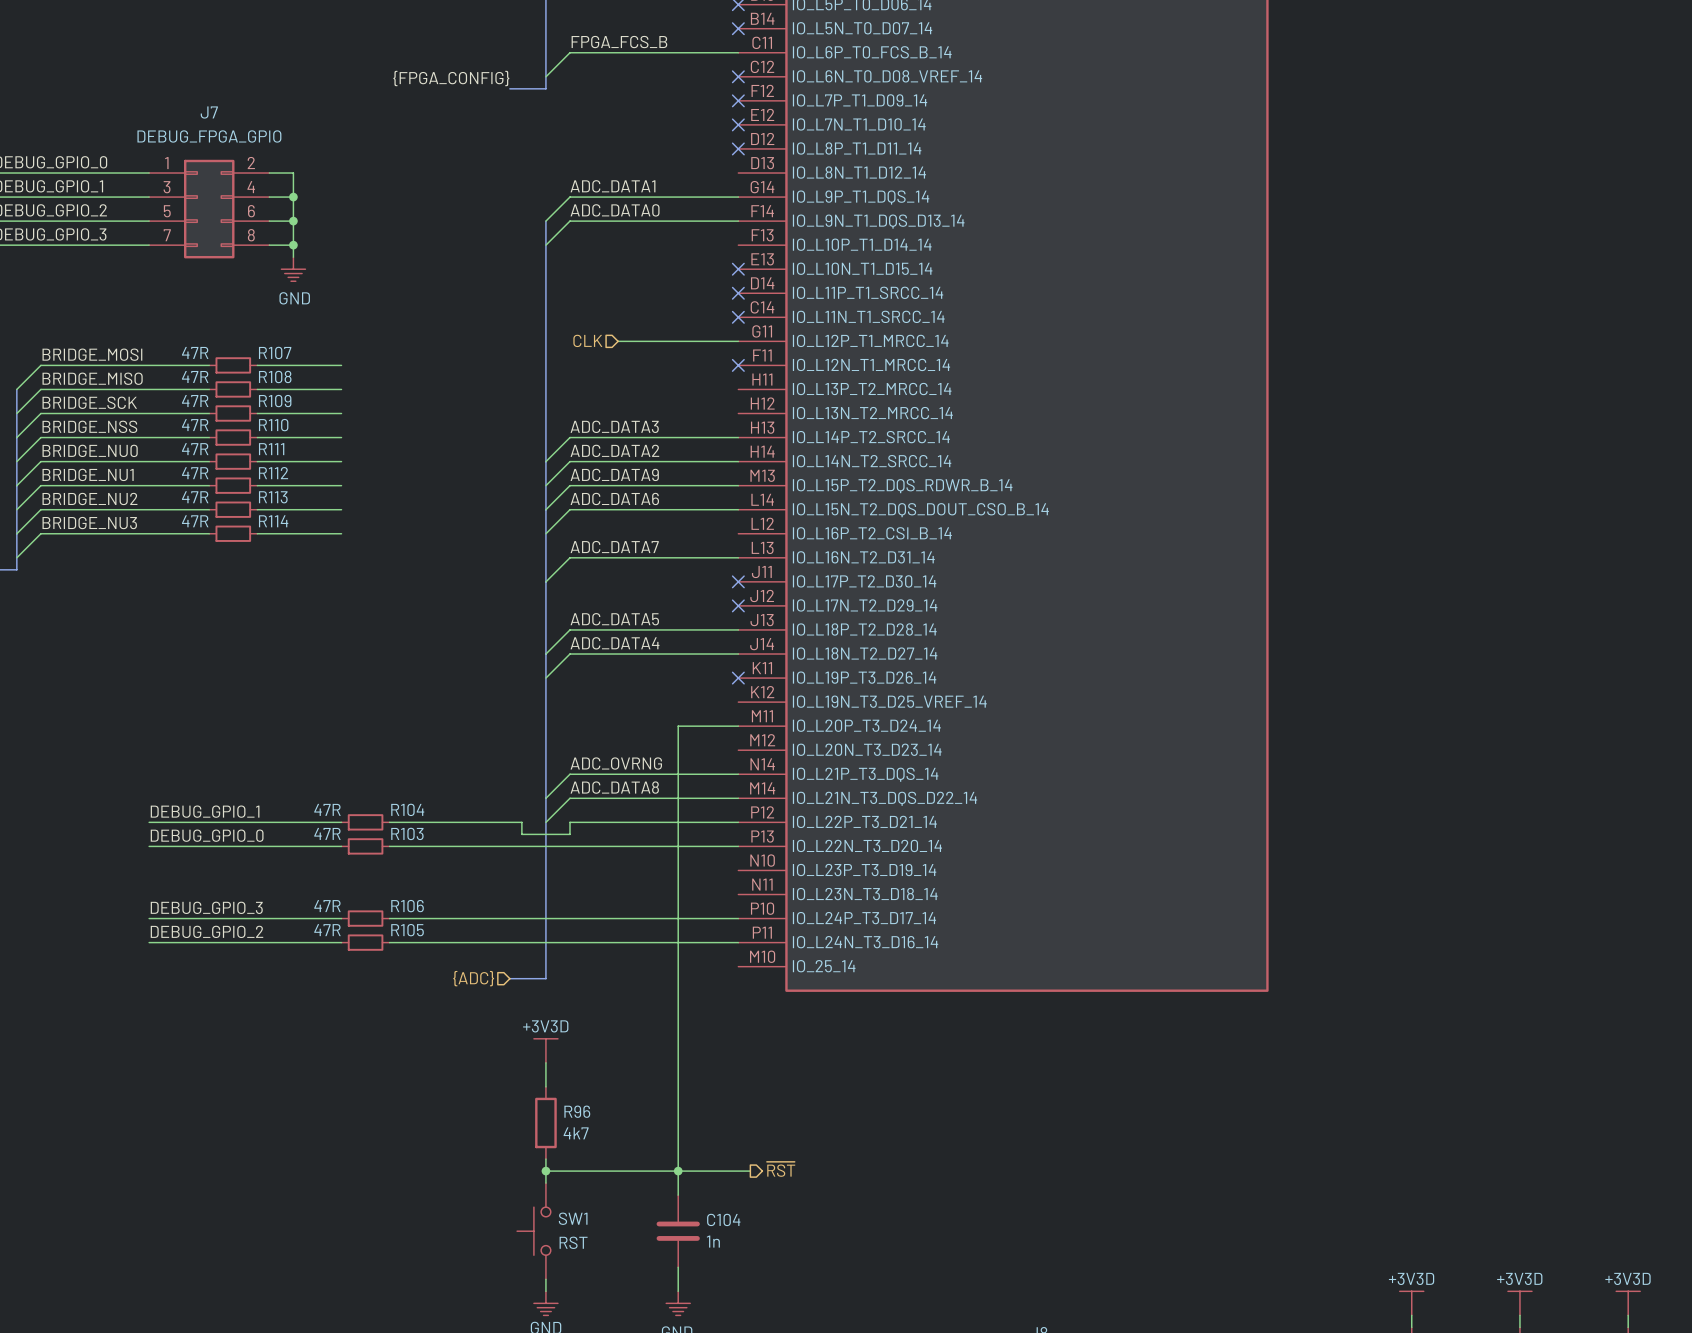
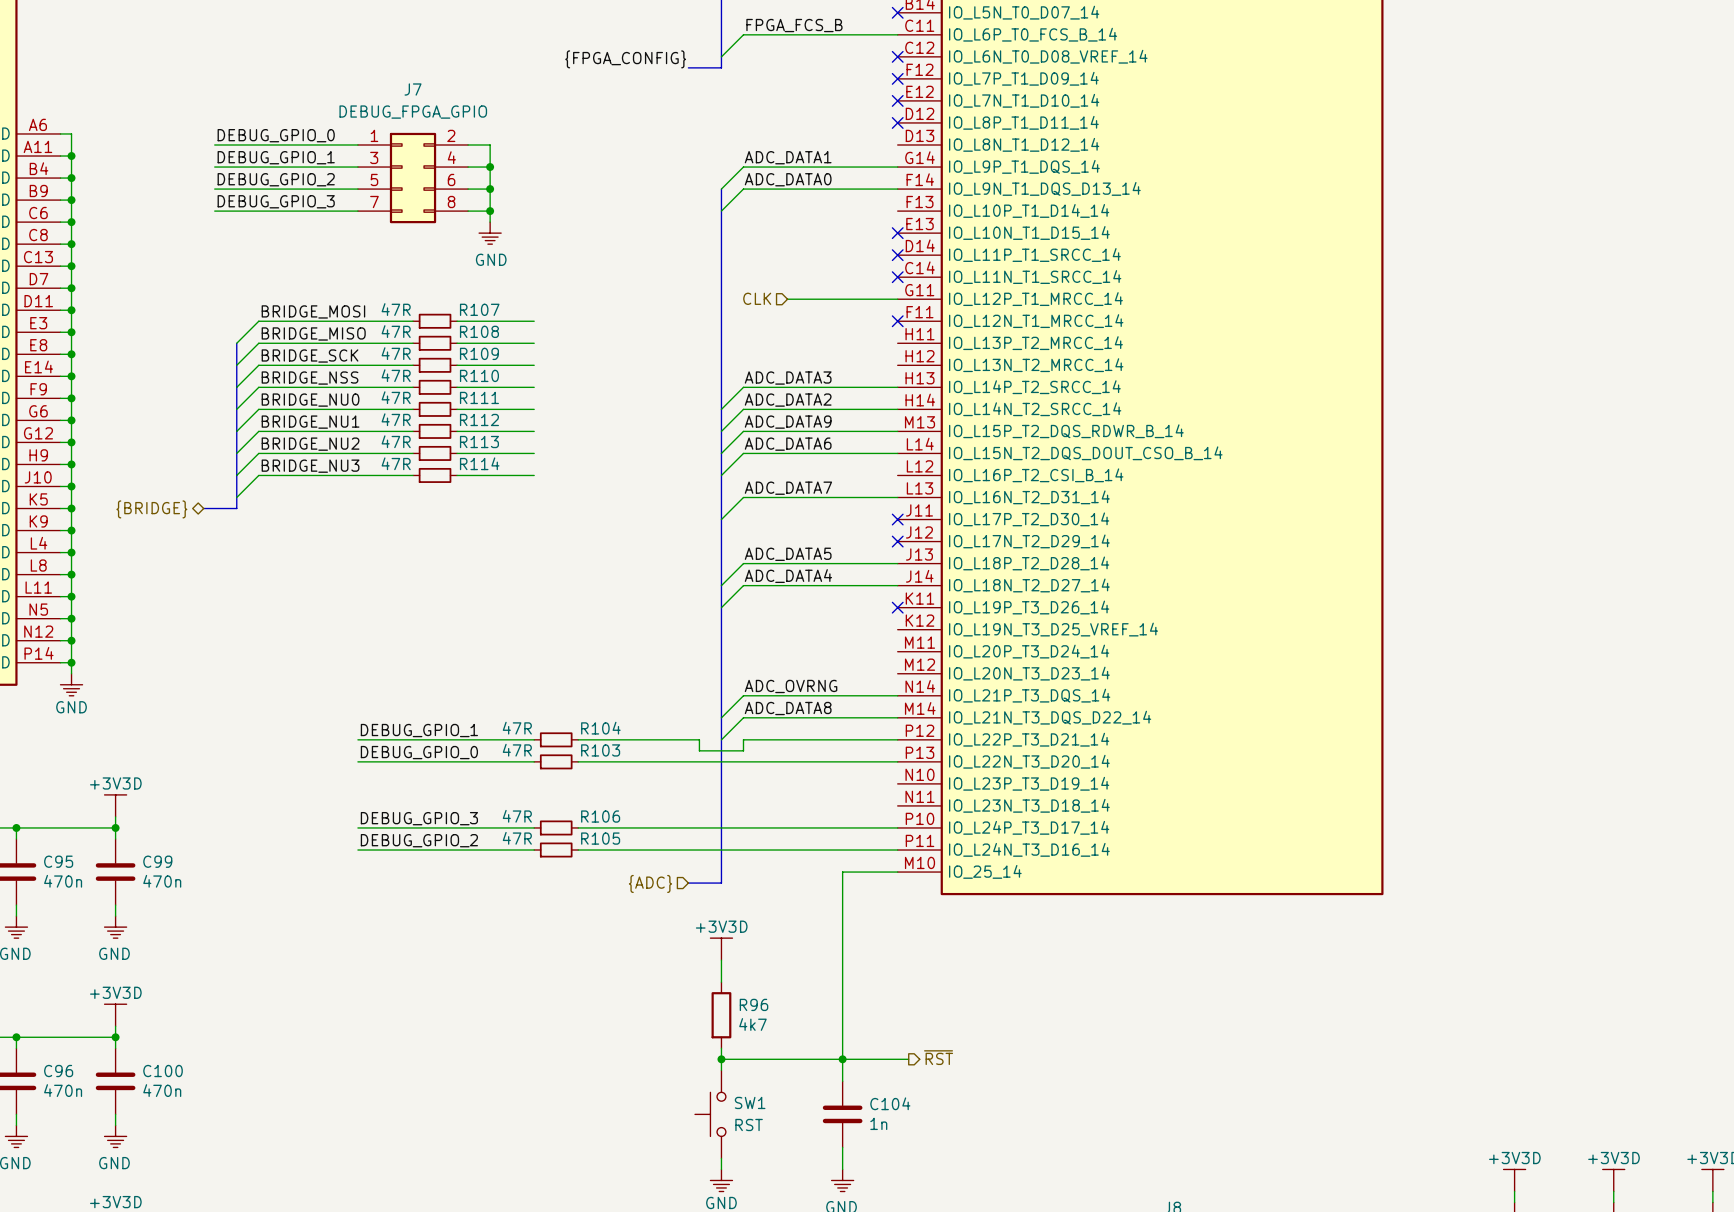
wire: (738, 726) (678, 726) (678, 966) -> (897, 872) (842, 872)

